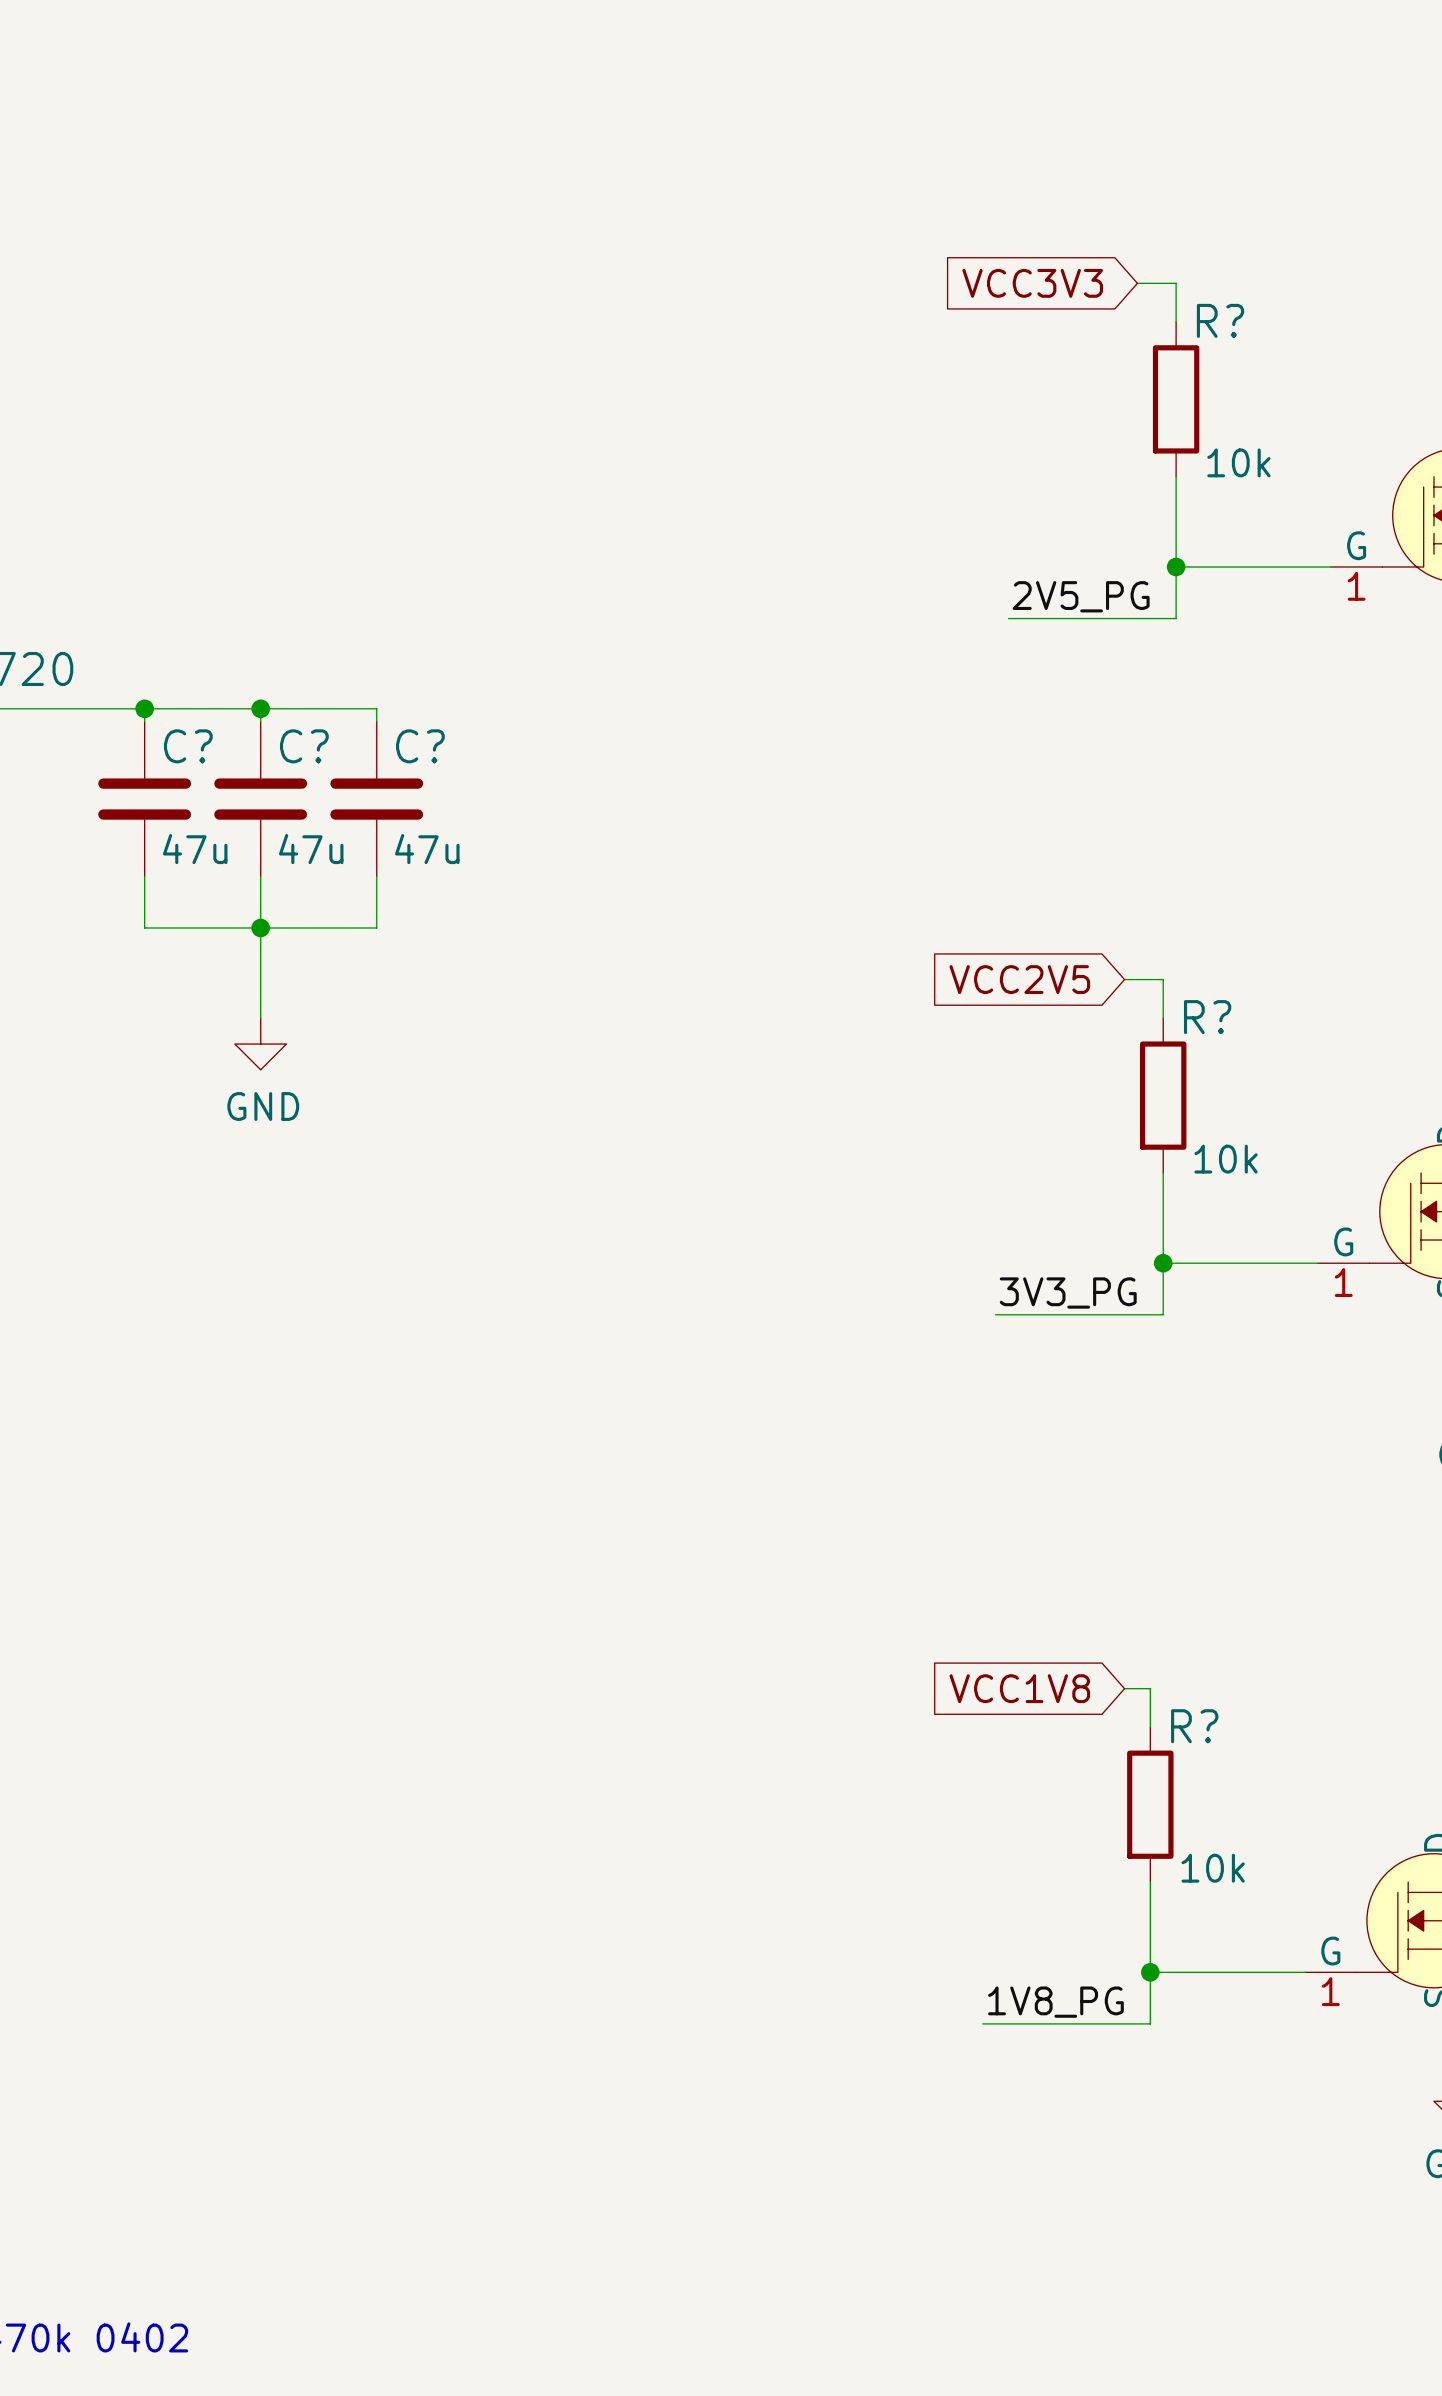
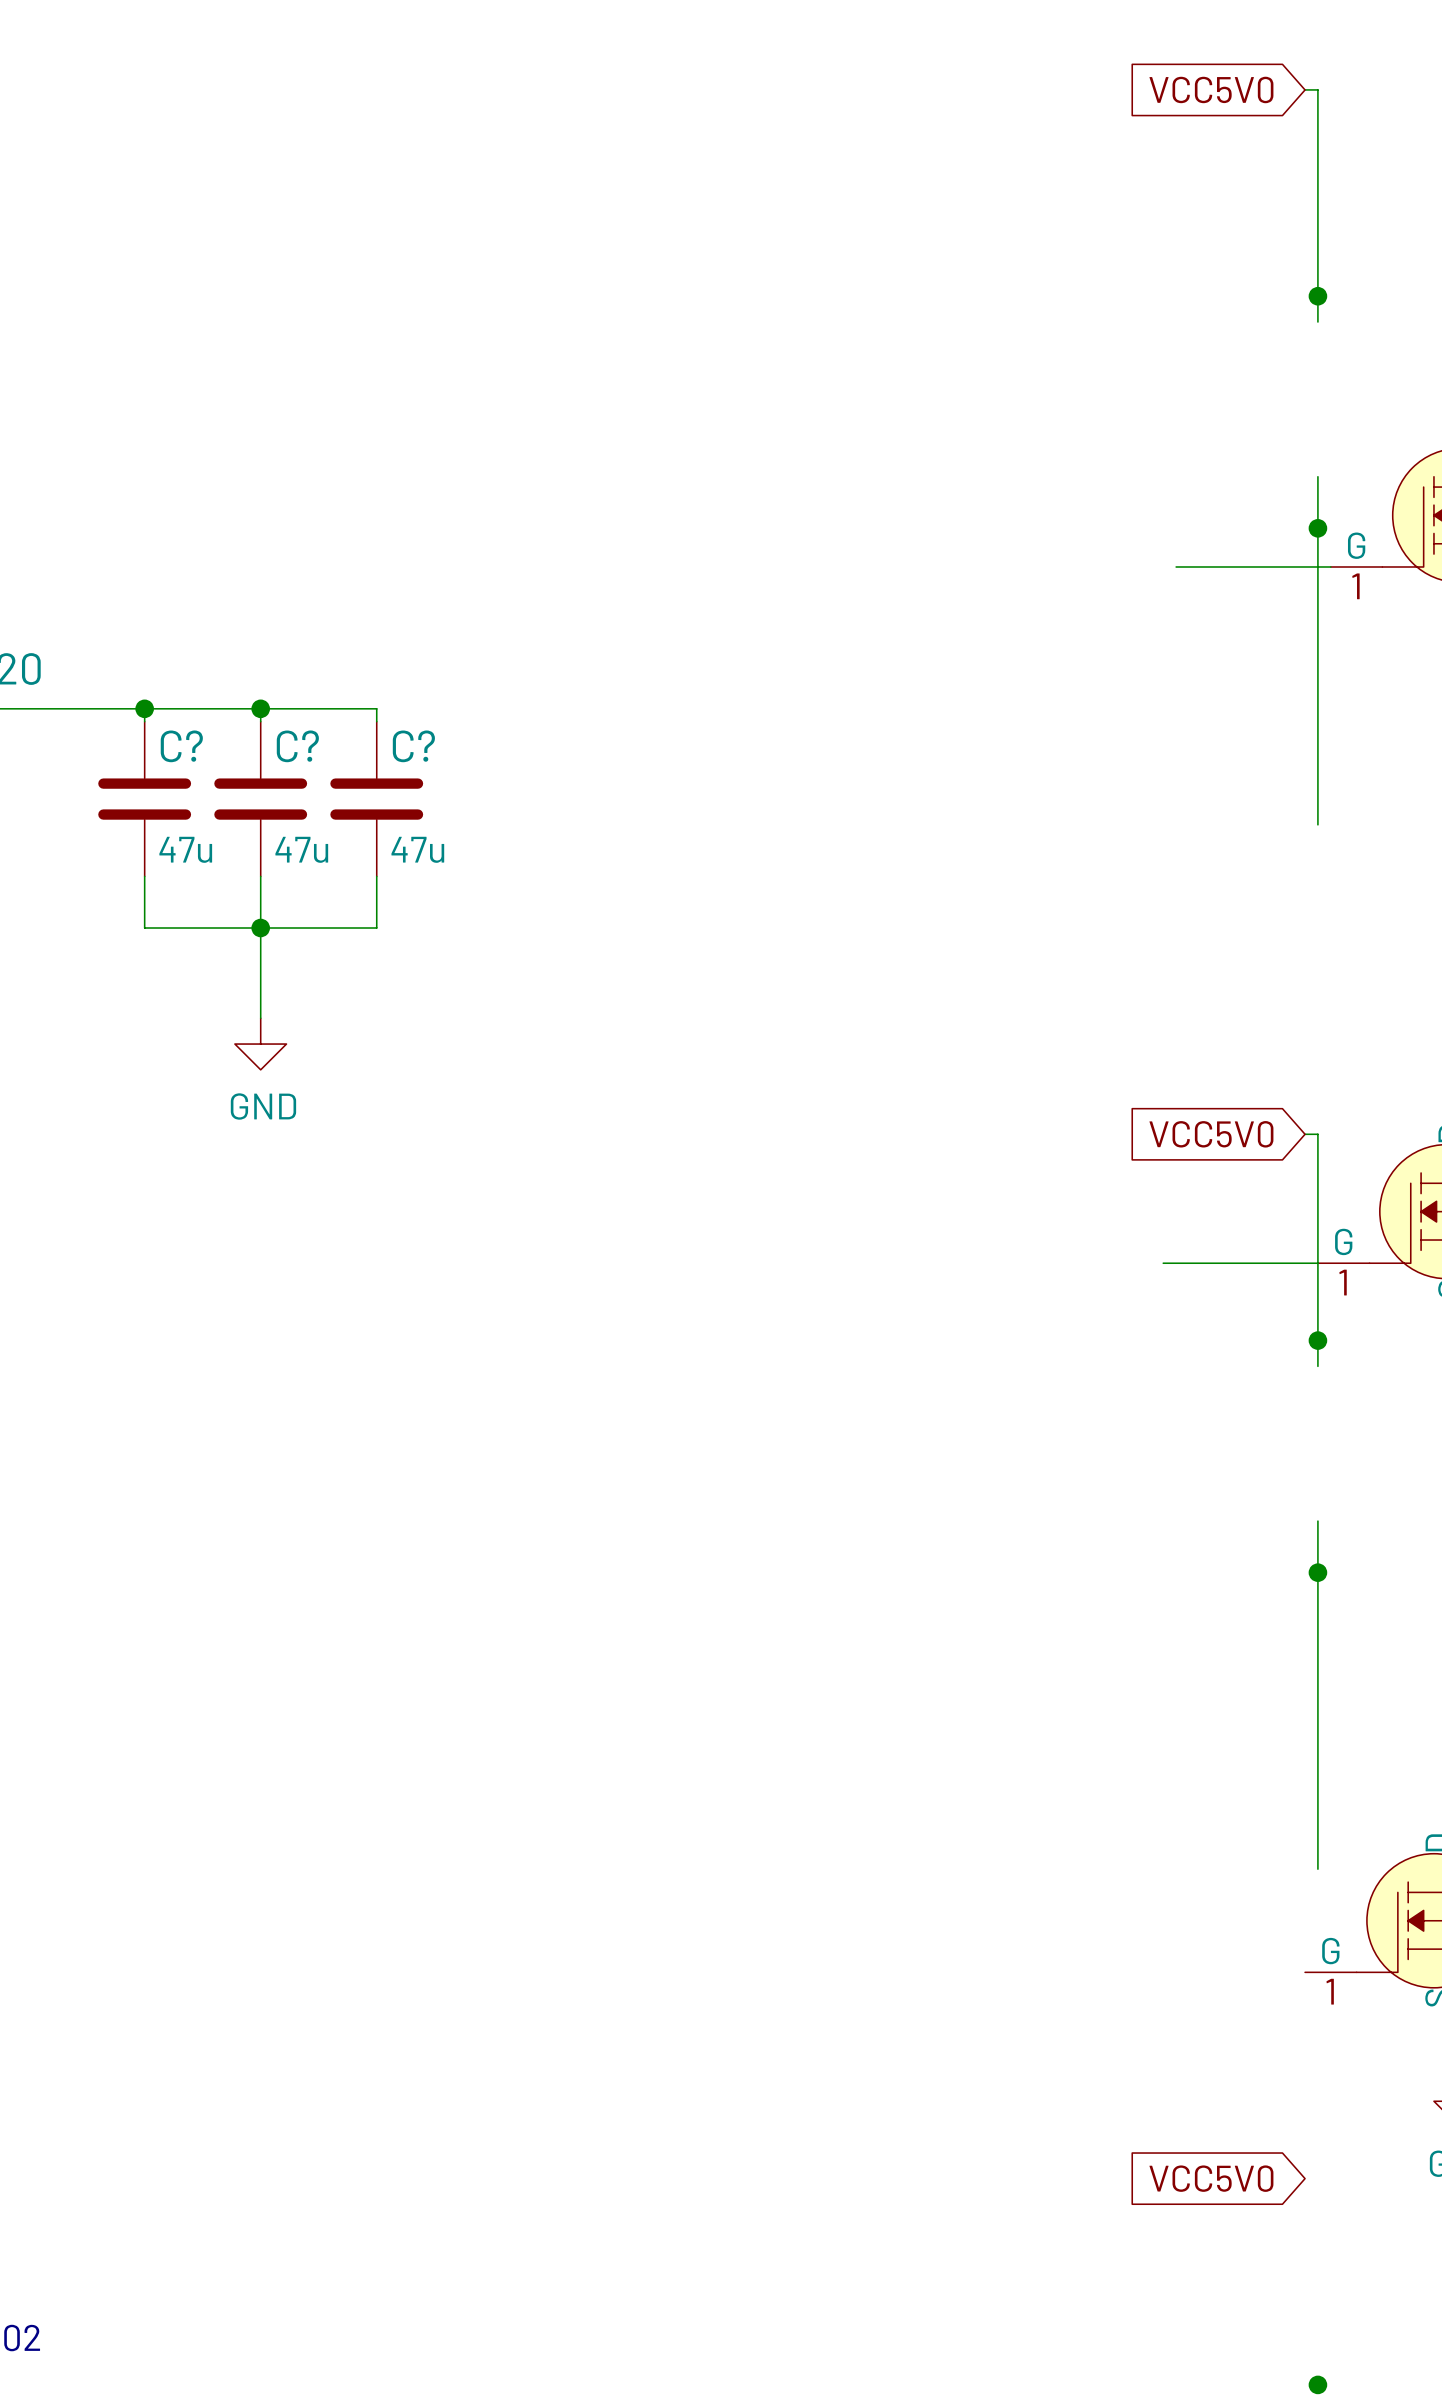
global label: none -> VCC5V0 (1211, 89)
wire: none -> (1305, 89) (1317, 89) (1317, 322)
global label: VCC3V3 (1032, 283) -> none
wire: (1137, 283) (1176, 283) (1176, 322) -> none
junction: none -> (1317, 296)
R?: (1176, 399) -> none
wire: (1176, 476) (1176, 618) (1008, 618) -> none
wire: none -> (1317, 476) (1317, 824)
junction: none -> (1317, 528)
junction: (1176, 566) -> none
label: 2V5_PG (1081, 596) -> none
global label: VCC2V5 (1019, 979) -> none
wire: (1124, 979) (1163, 979) (1163, 1018) -> none
R?: (1163, 1095) -> none
global label: none -> VCC5V0 (1211, 1134)
wire: none -> (1305, 1134) (1317, 1134) (1317, 1366)
wire: (1163, 1172) (1163, 1314) (995, 1314) -> none
junction: (1163, 1263) -> none
label: 3V3_PG (1068, 1293) -> none
junction: none -> (1317, 1340)
wire: none -> (1317, 1521) (1317, 1869)
junction: none -> (1317, 1572)
global label: VCC1V8 (1019, 1688) -> none
wire: (1124, 1688) (1150, 1688) (1150, 1727) -> none
R?: (1150, 1804) -> none
wire: (1150, 1882) (1150, 2023) (982, 2023) -> none
wire: (1150, 1972) (1305, 1972) -> none
junction: (1150, 1972) -> none
label: 1V8_PG (1055, 2002) -> none
global label: none -> VCC5V0 (1211, 2178)
junction: none -> (1317, 2384)

